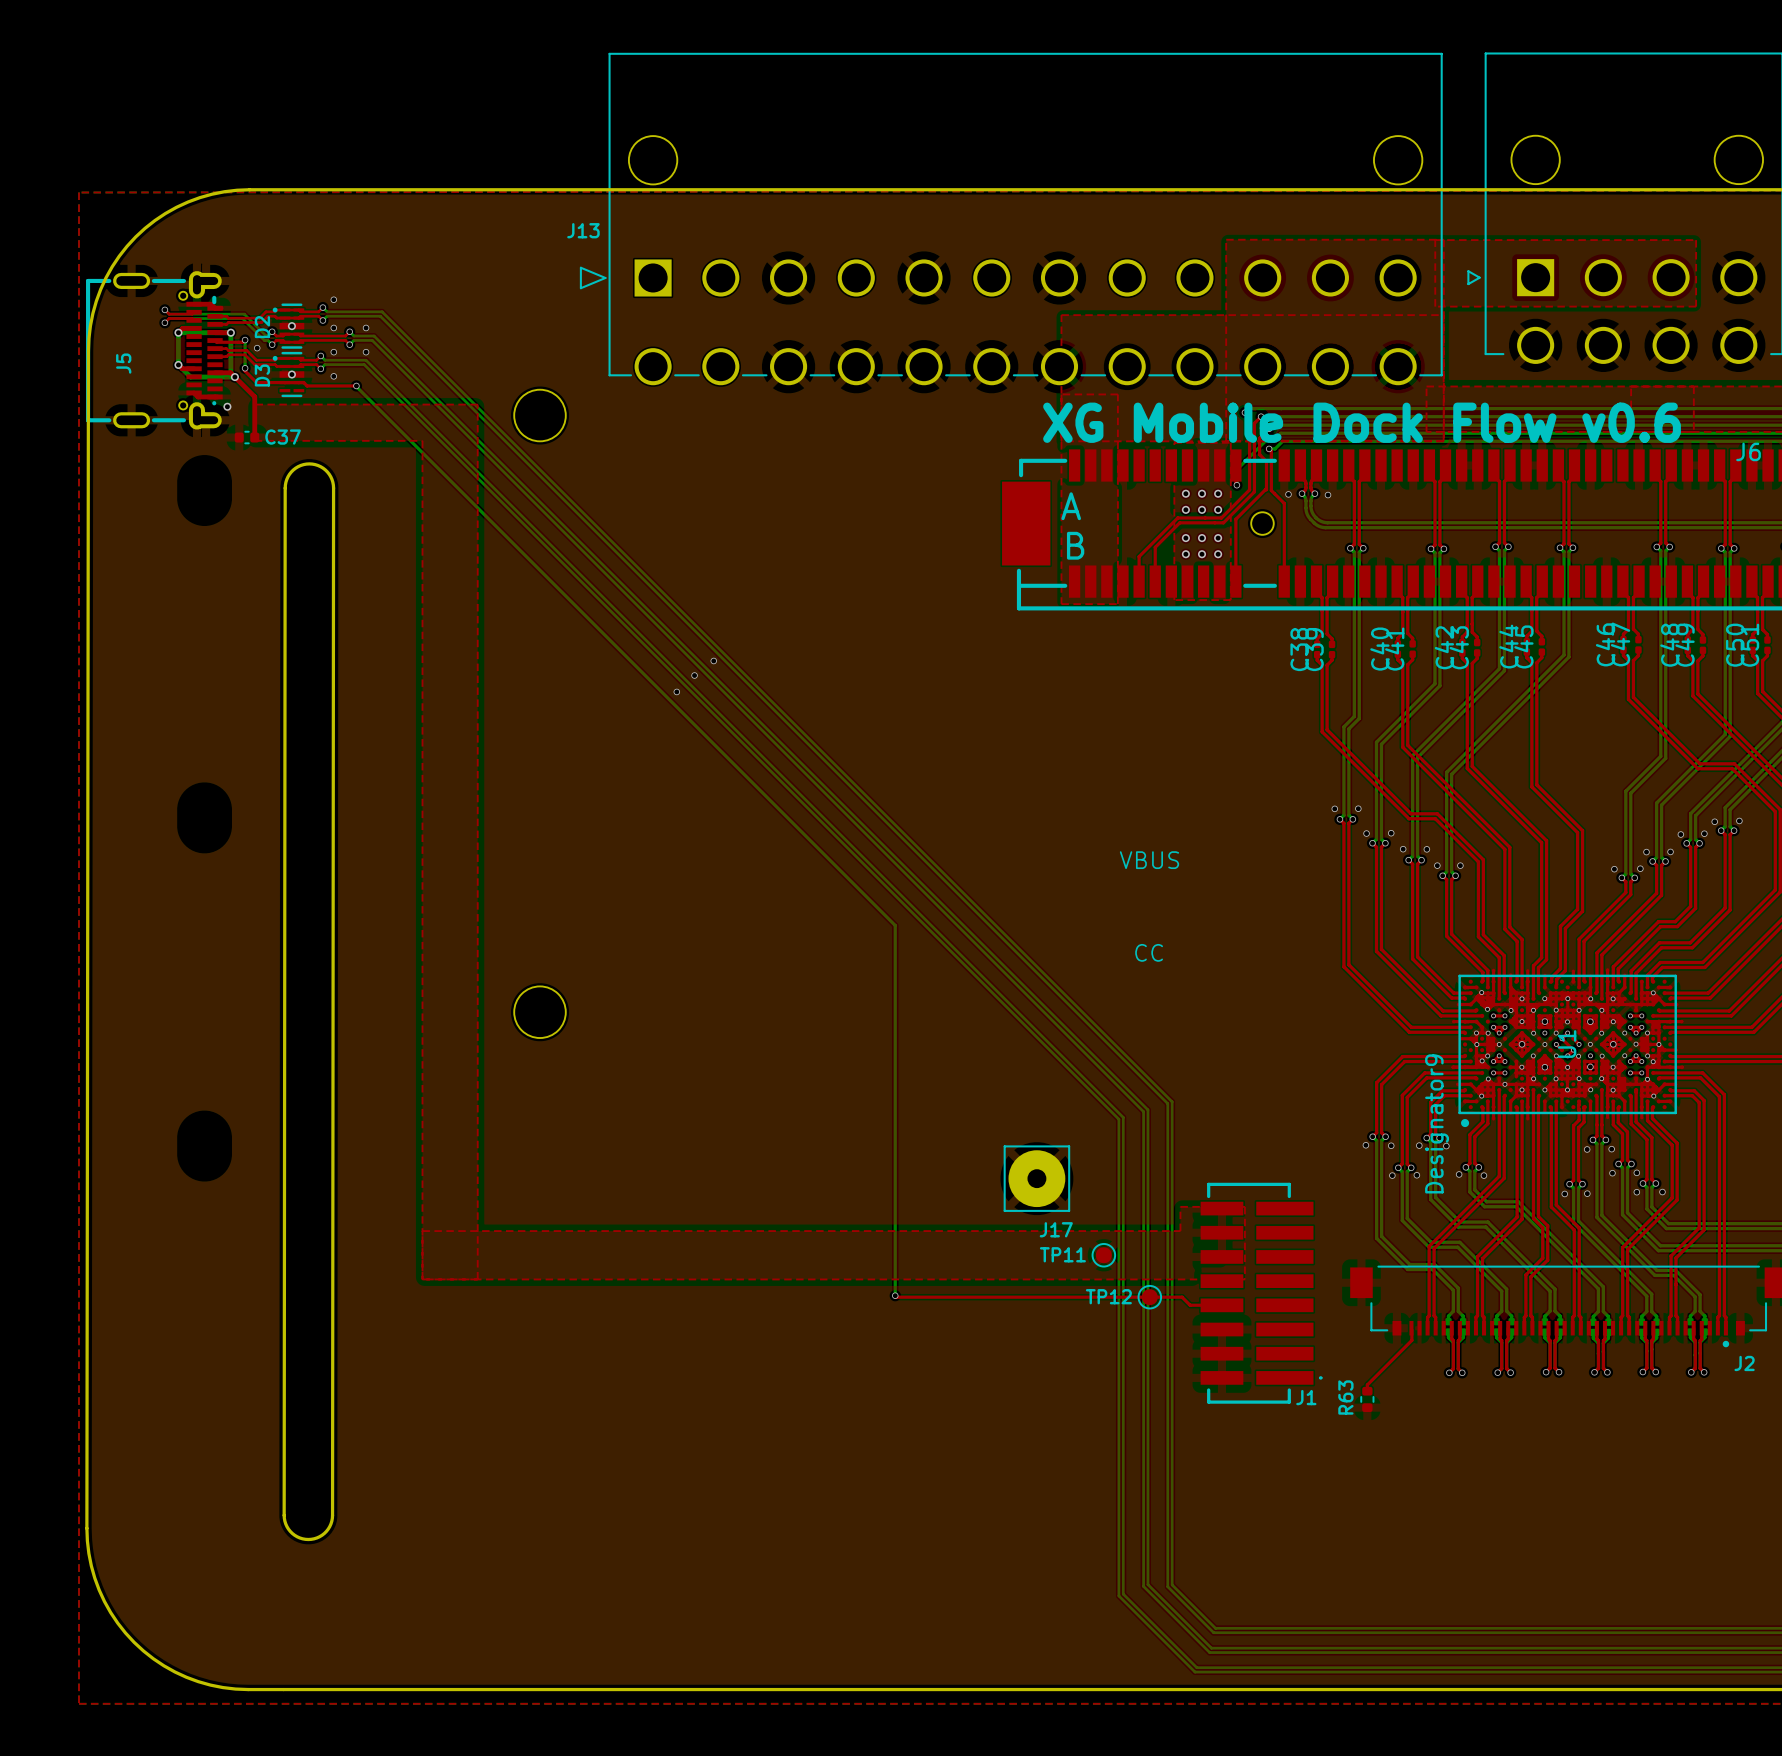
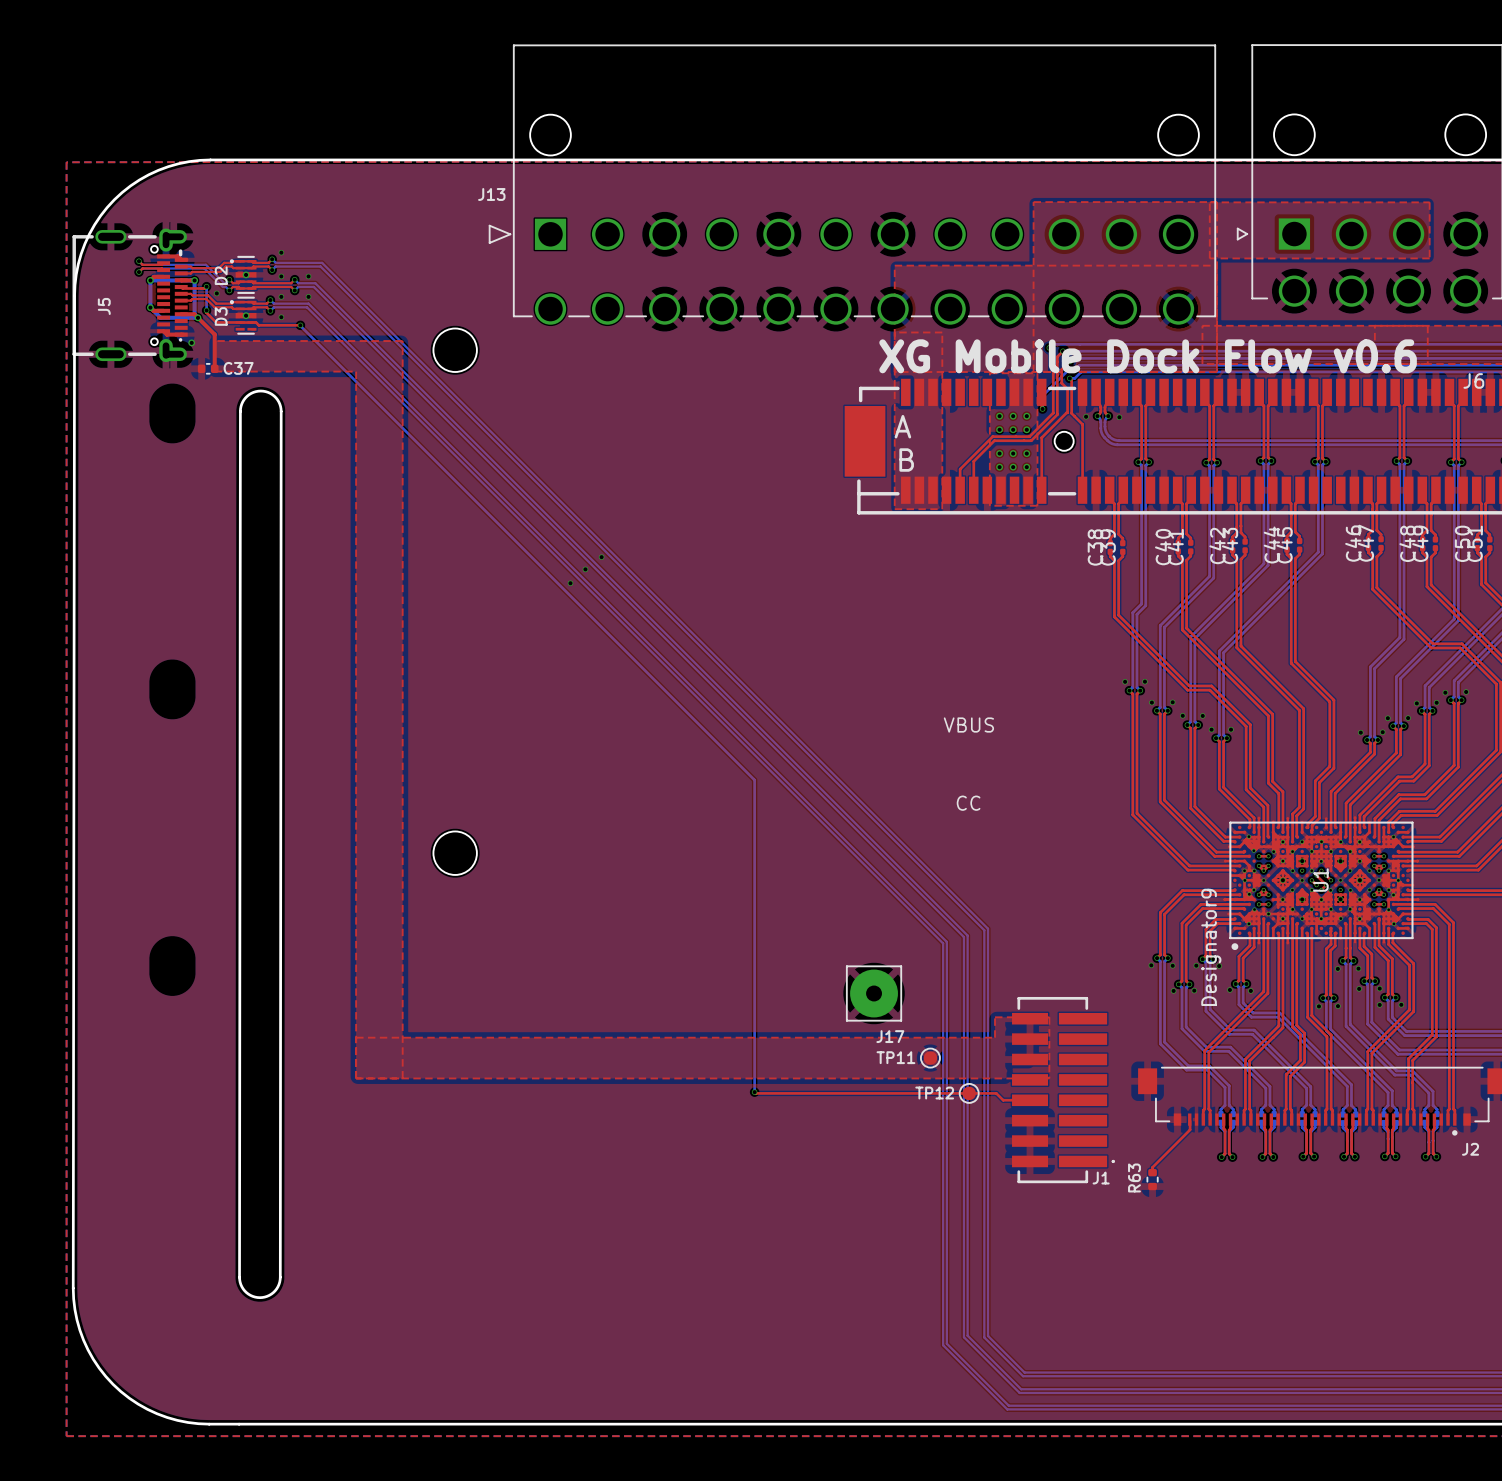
via: none -> (1326, 875)
via: none -> (1316, 885)

